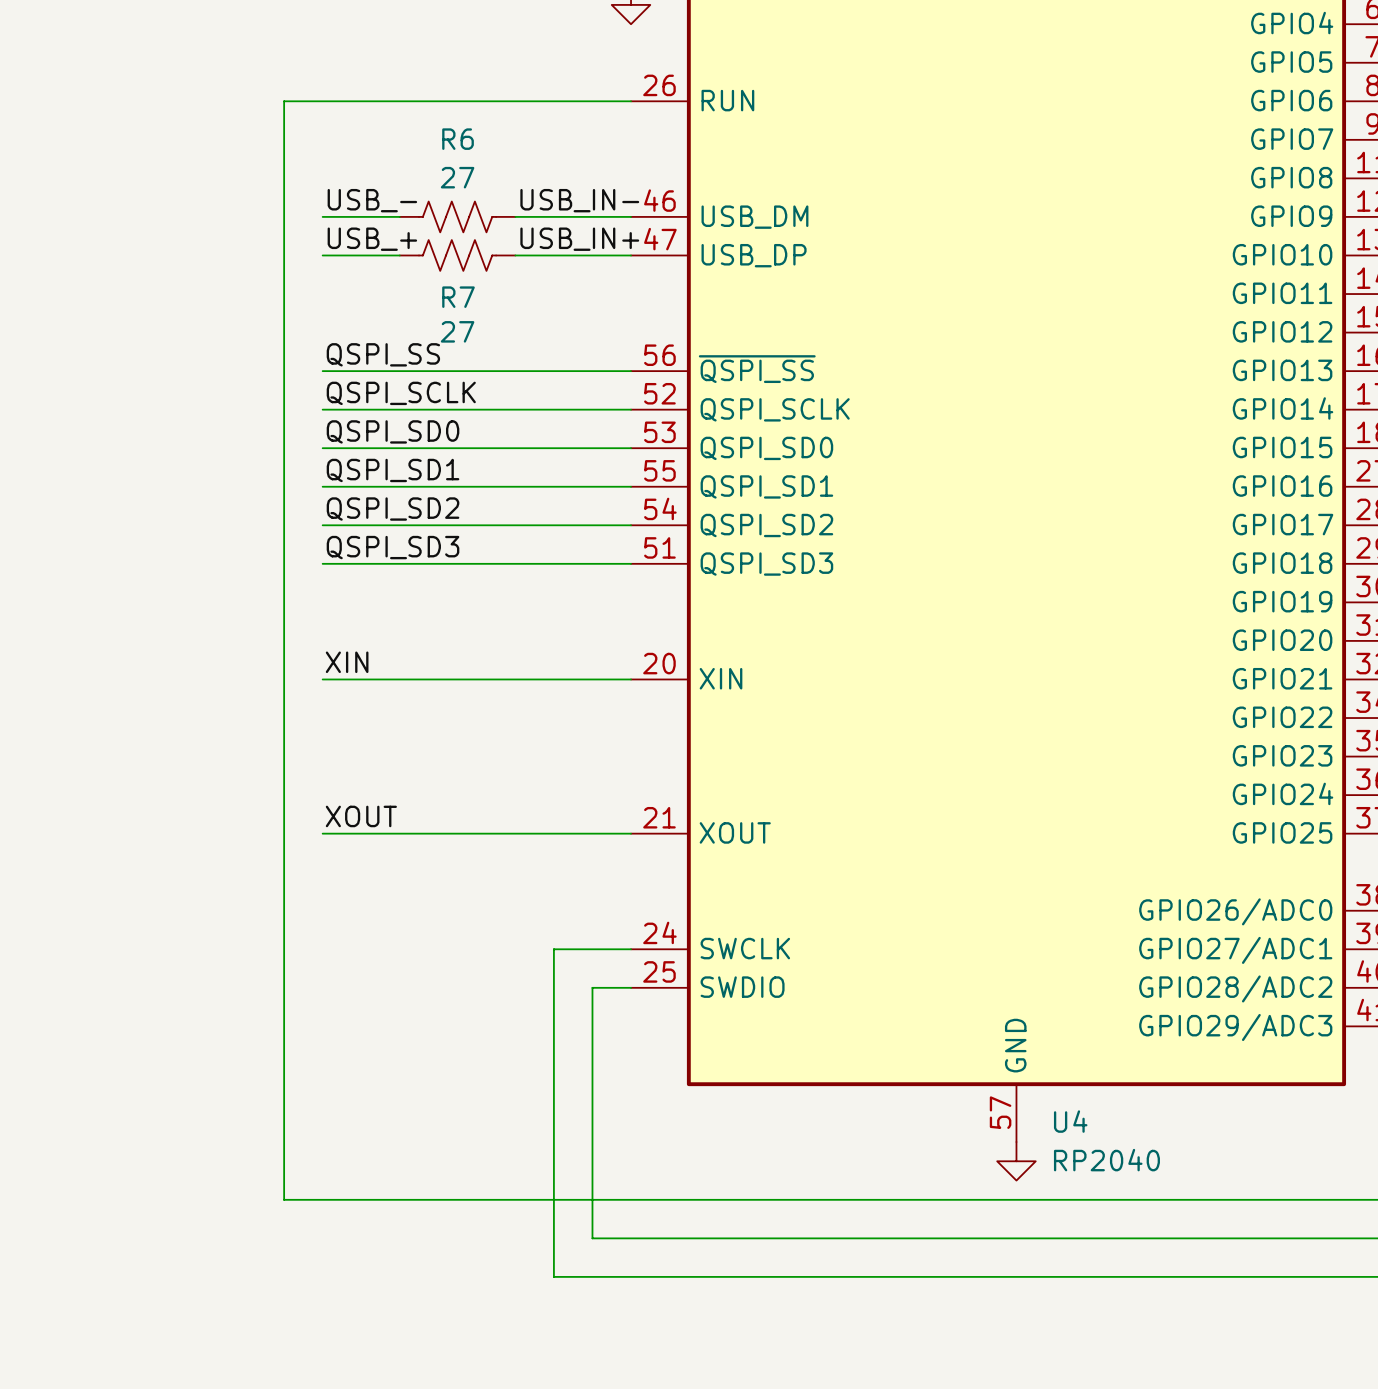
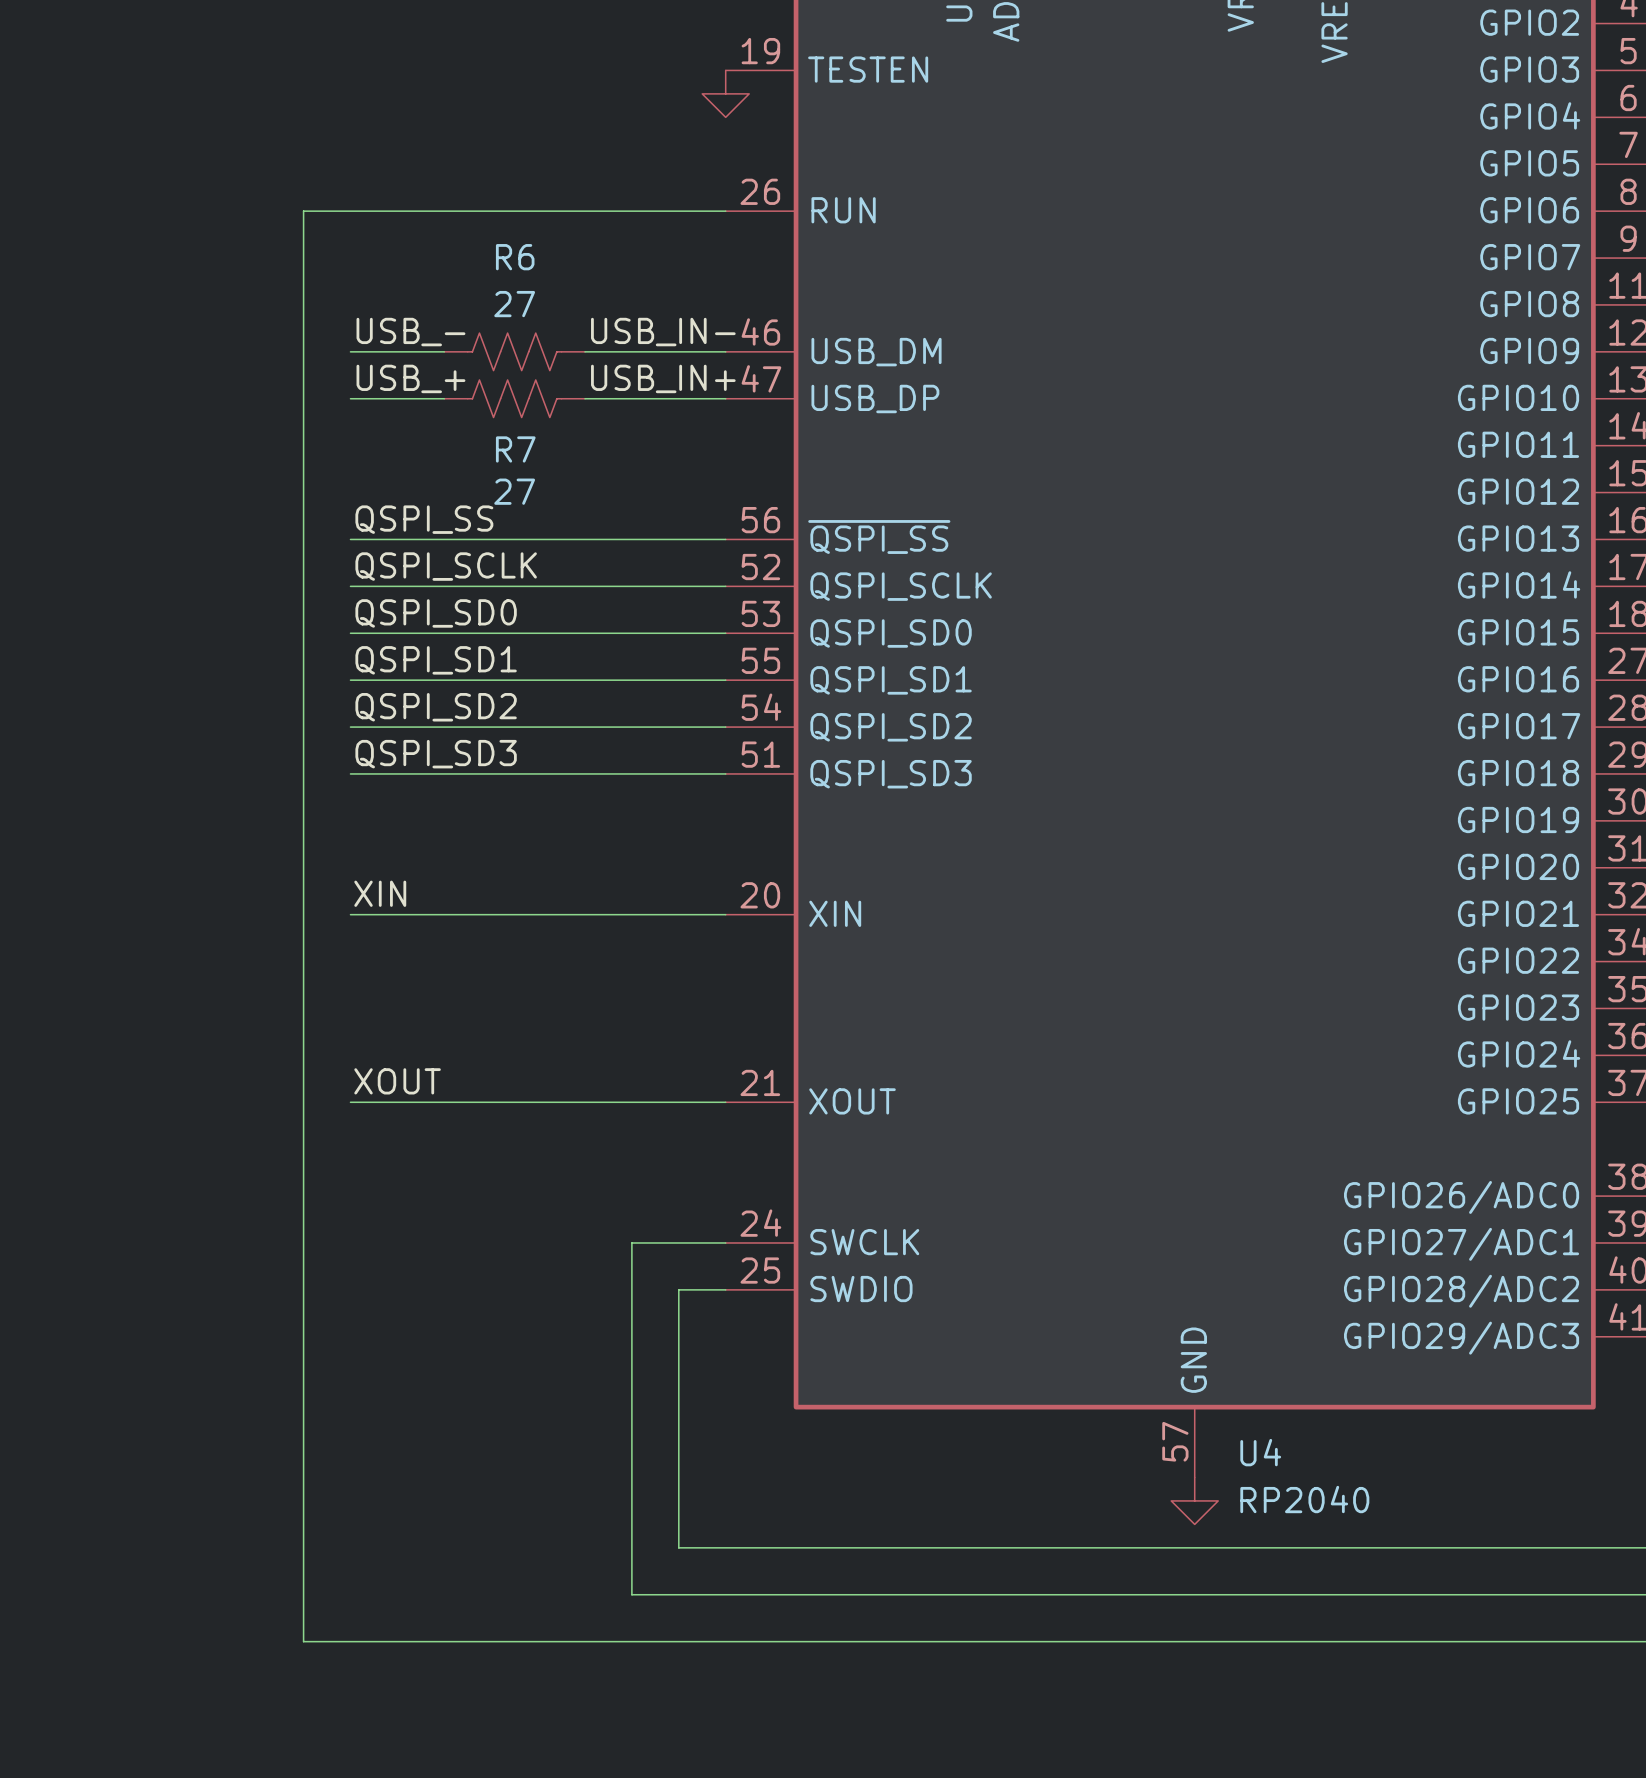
wire: (284, 1199) (592, 1199) (592, 1238) -> (303, 1547) (303, 1641) (631, 1641)
wire: (553, 1238) (553, 1276) -> (631, 1594) (678, 1594)

